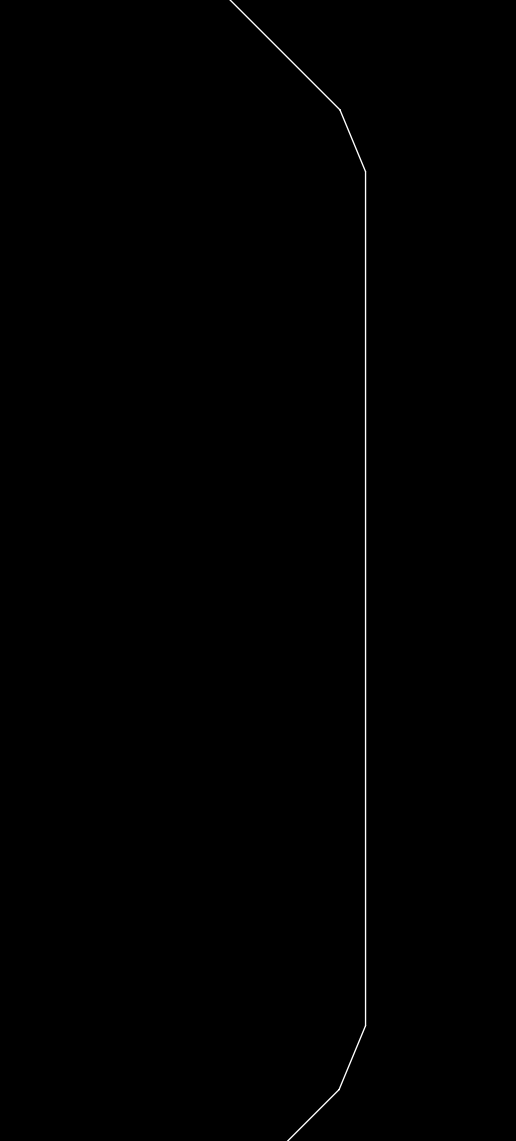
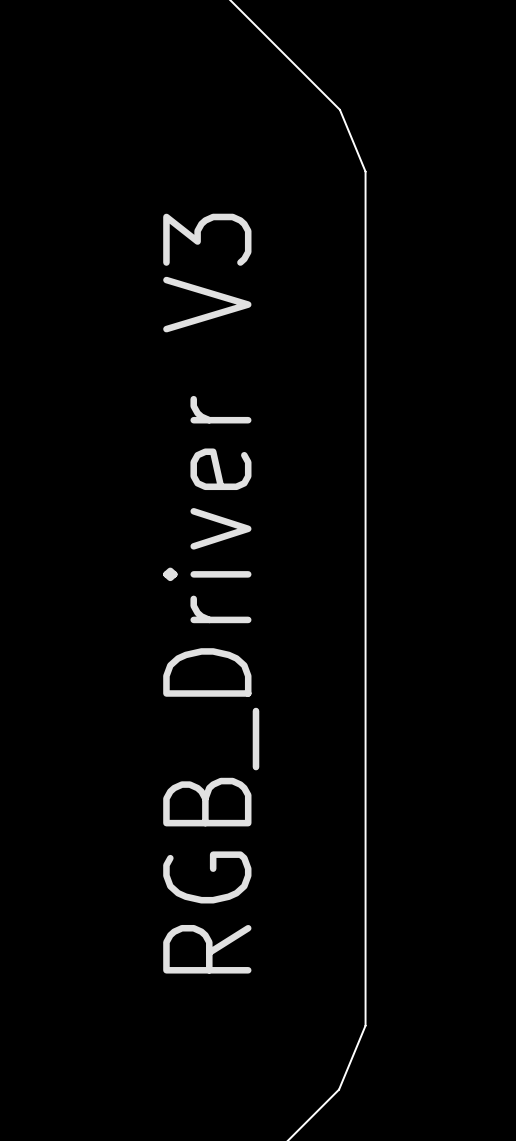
text: none -> RGB_Driver V3 (211, 593)

